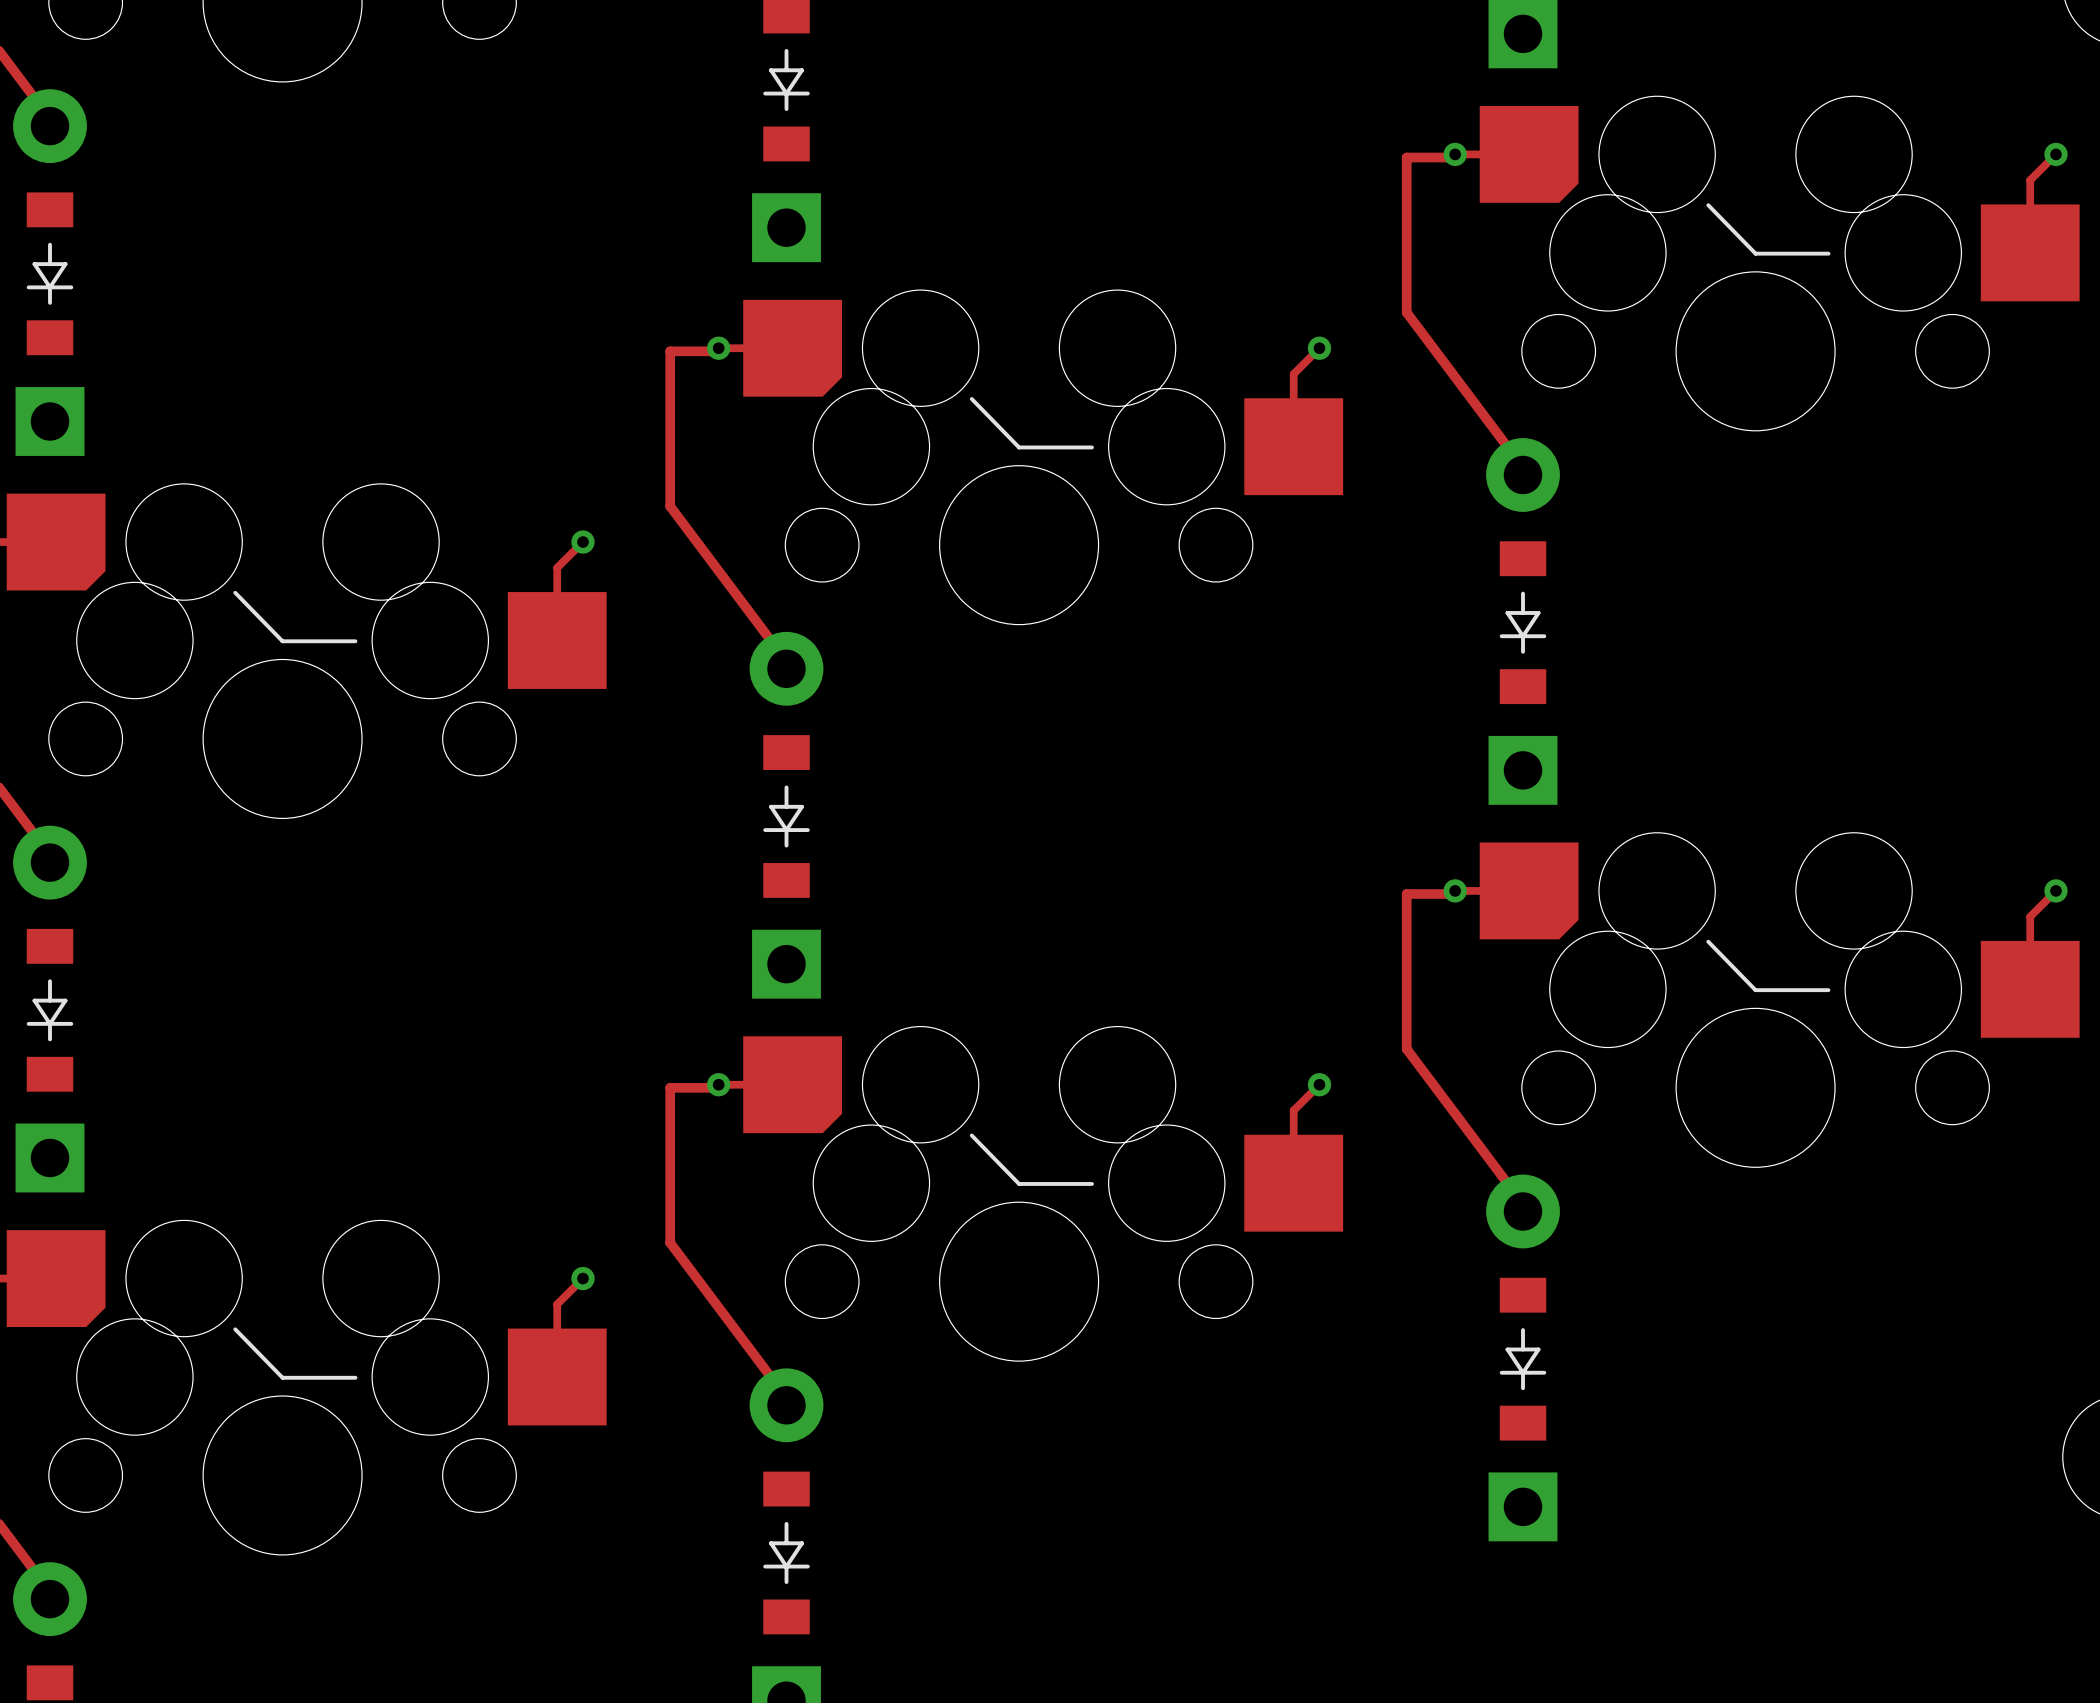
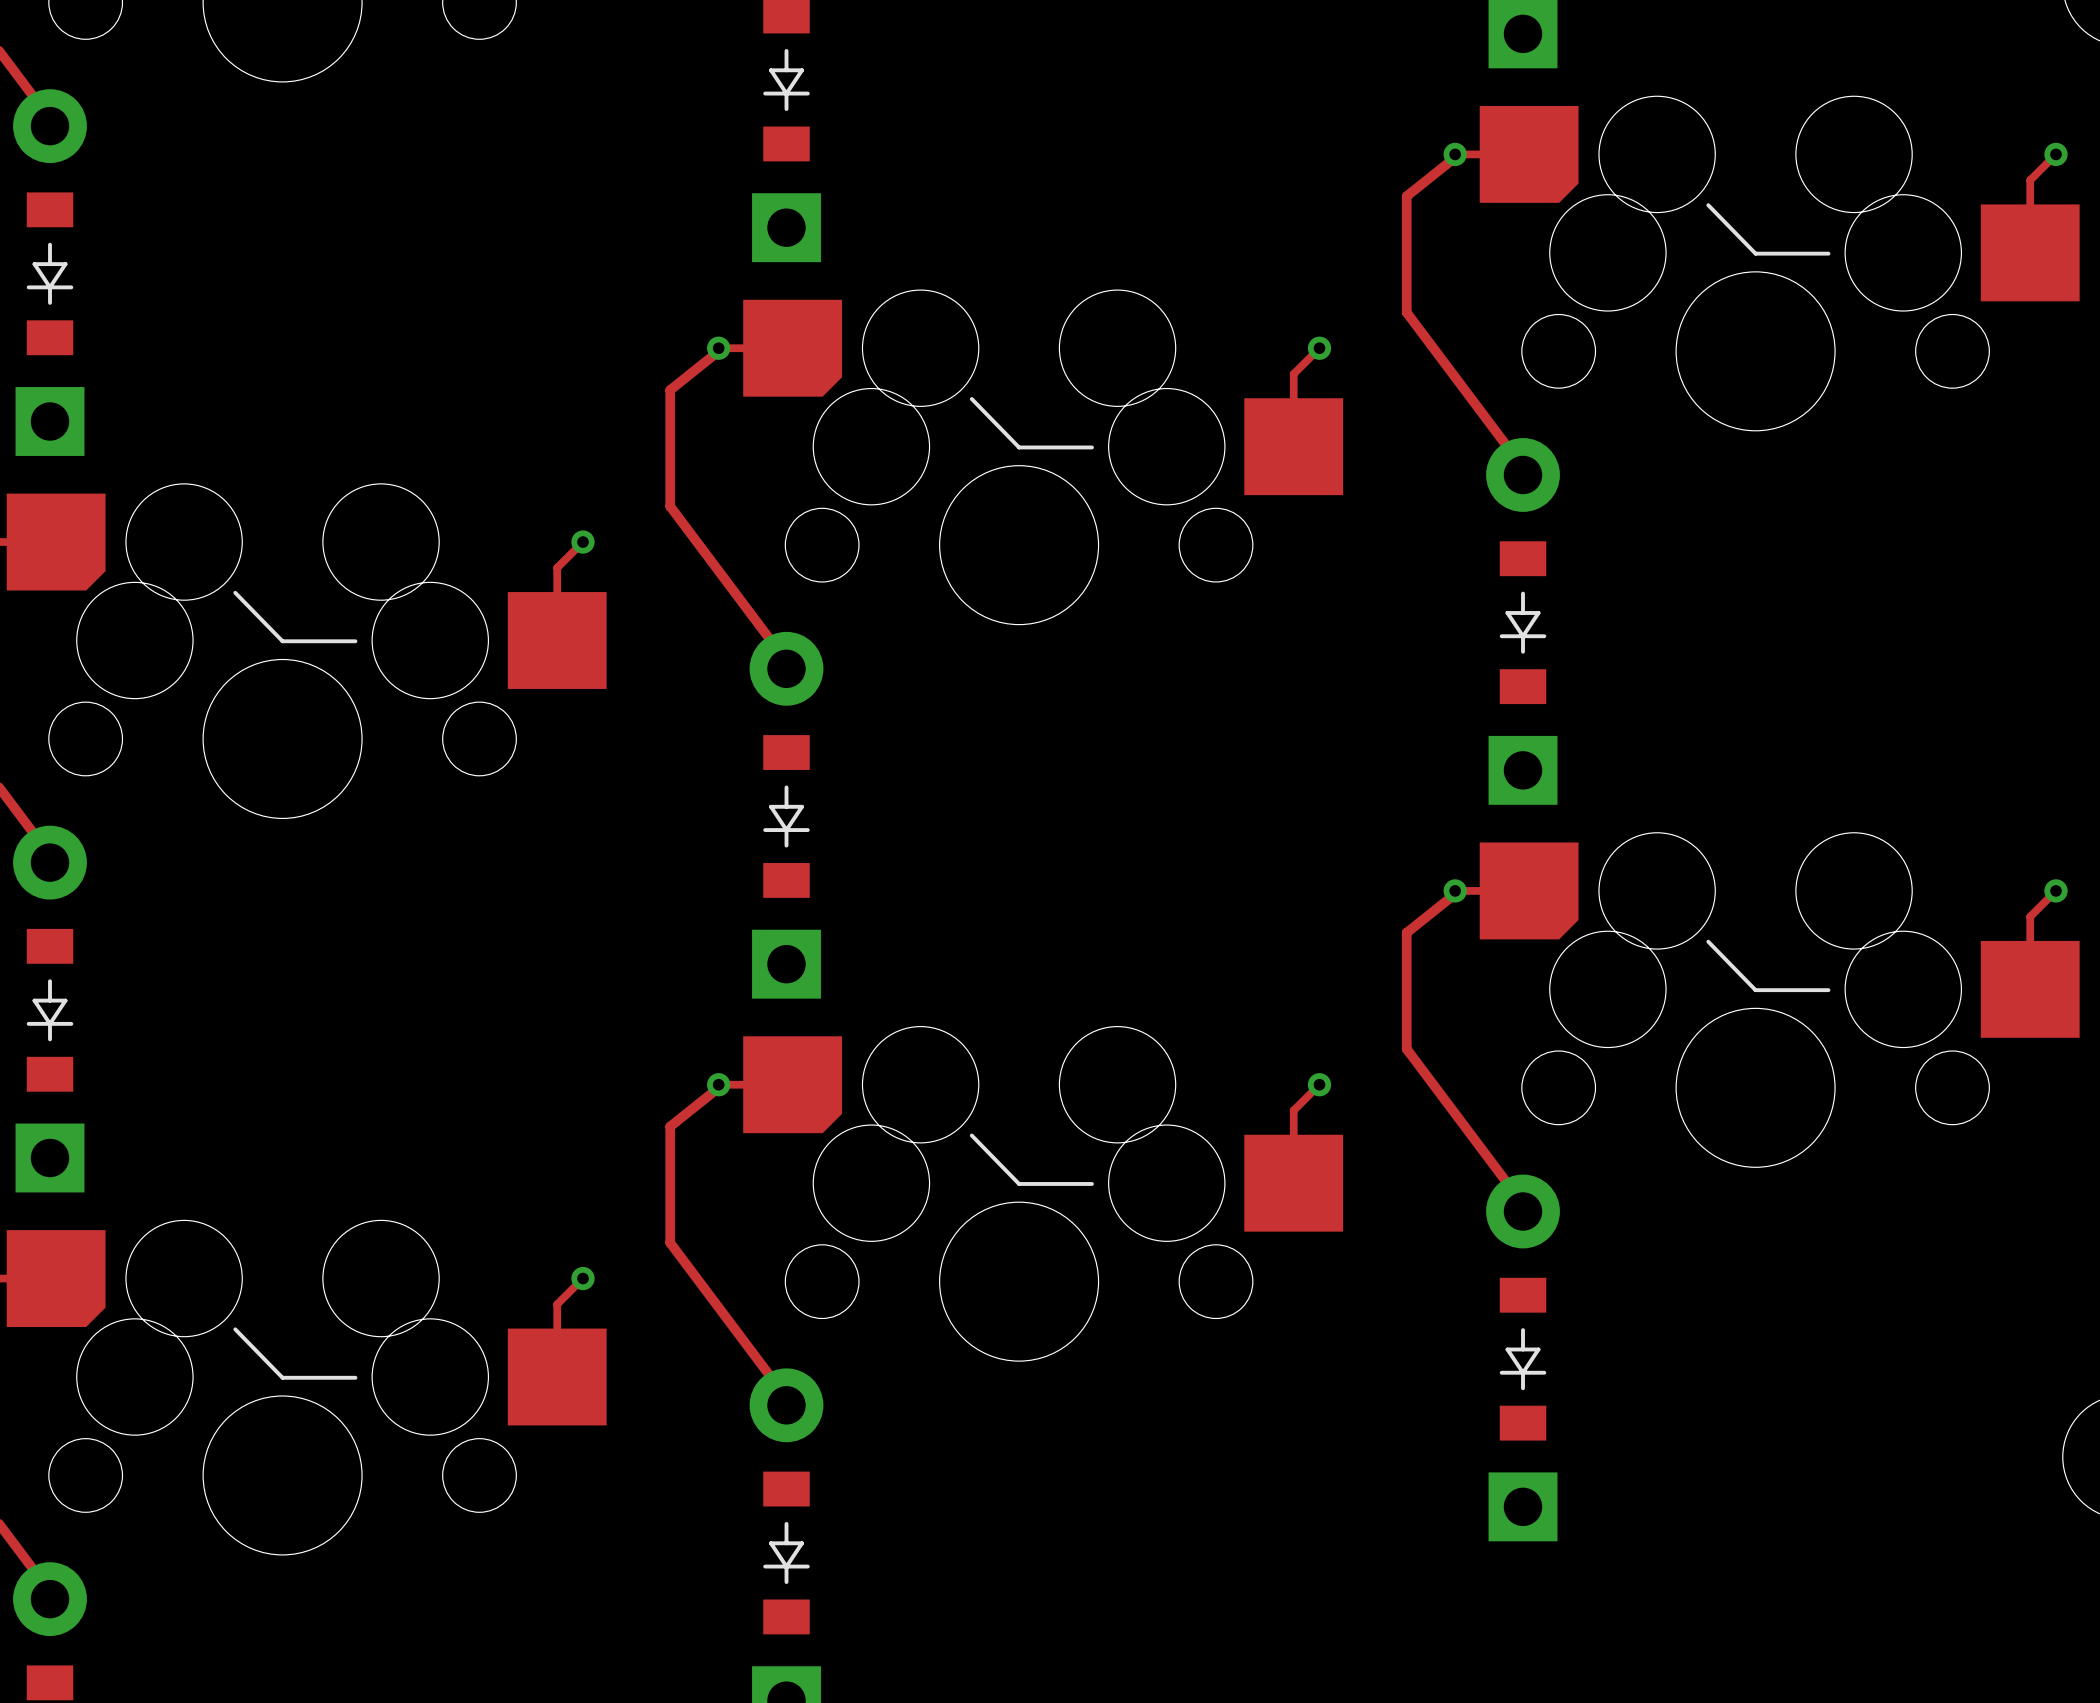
track: (1455, 157) (1406, 157) (1406, 196) -> (1455, 157) (1406, 196)
track: (718, 351) (670, 351) (670, 390) -> (718, 351) (670, 390)
track: (1455, 894) (1406, 894) (1406, 932) -> (1455, 894) (1406, 932)
track: (718, 1087) (670, 1087) (670, 1126) -> (718, 1087) (670, 1126)

